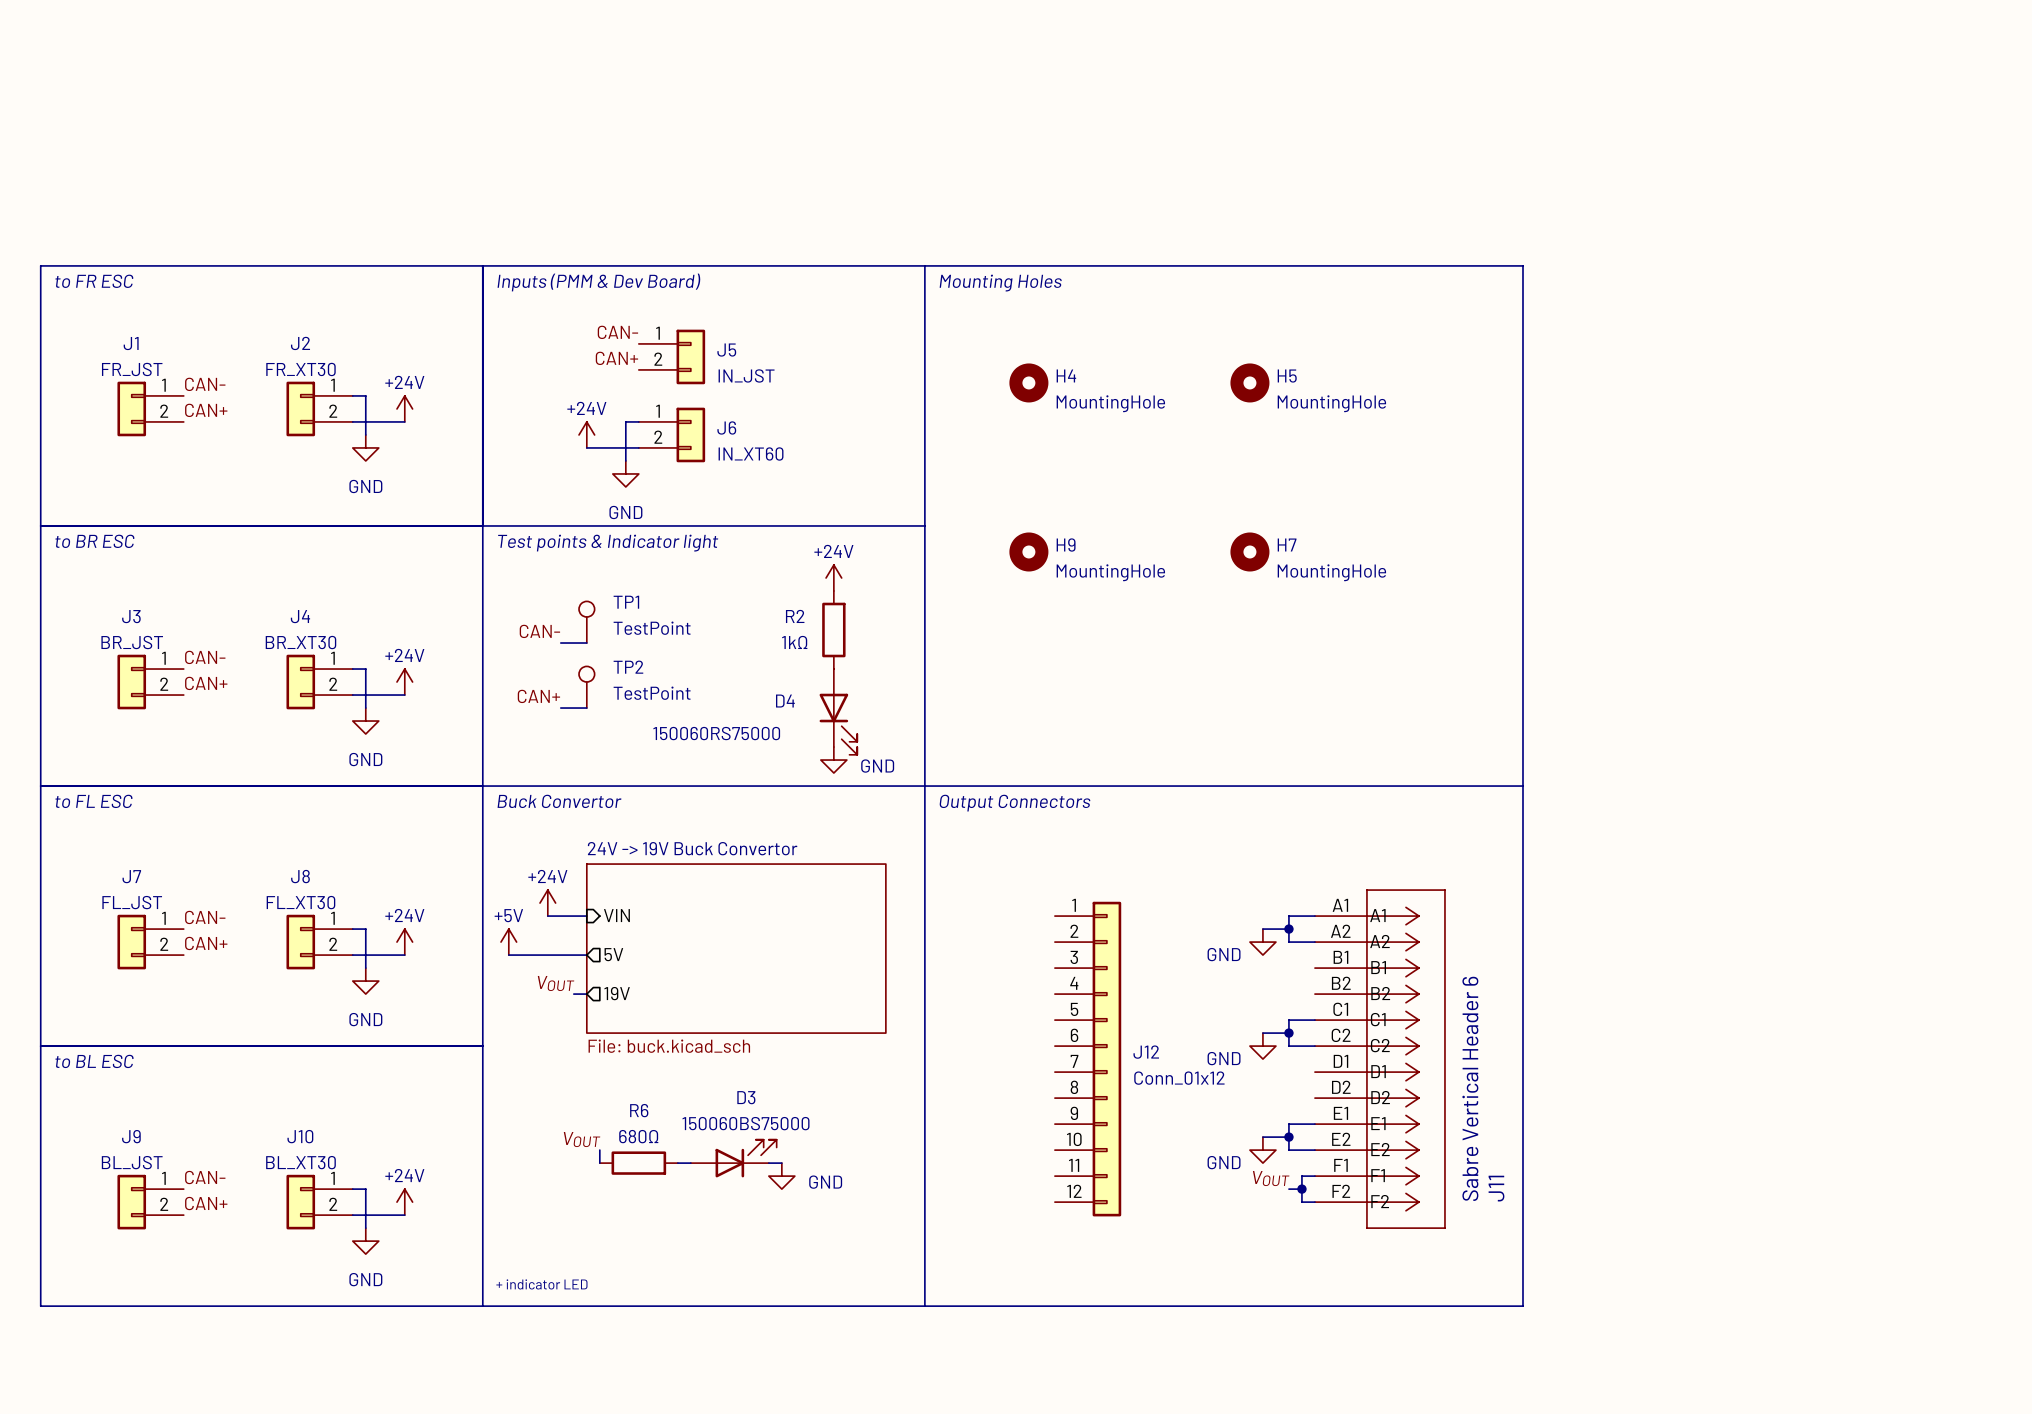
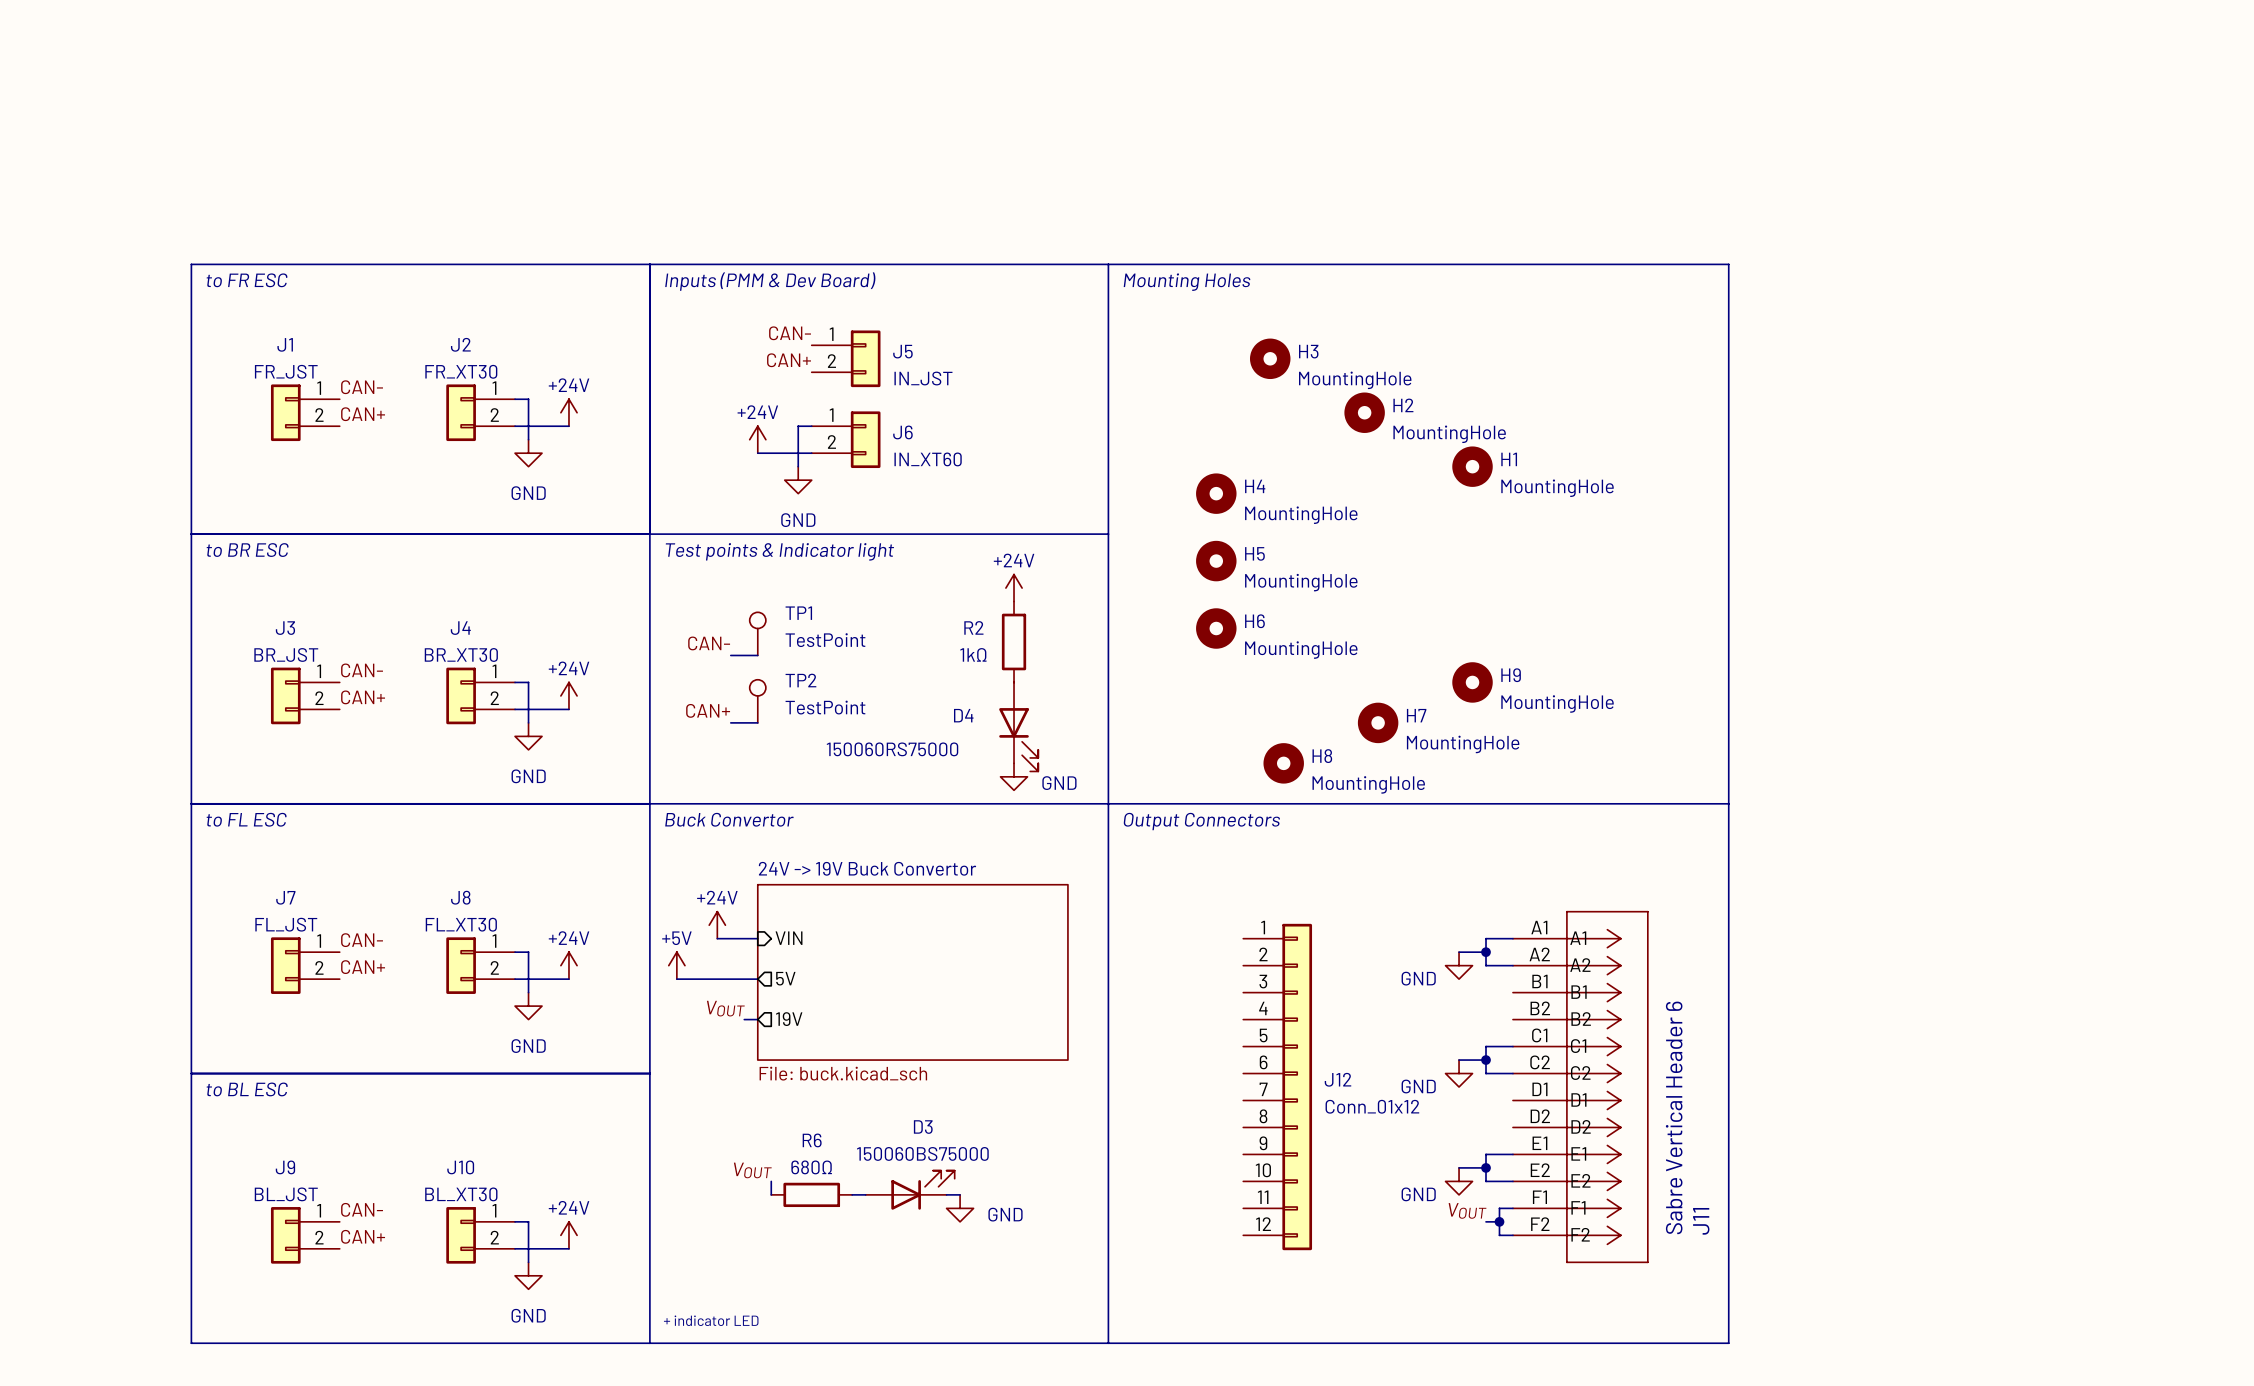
H3: none -> MountingHole (1270, 358)
H4 position: (1028, 382) -> (1216, 493)
H5: MountingHole (1249, 382) -> none
H2: none -> MountingHole (1364, 412)
H1: none -> MountingHole (1472, 466)
H9 name: H9 (1066, 545) -> H5 (1254, 553)
H7 position: (1249, 551) -> (1378, 722)
H6: none -> MountingHole (1216, 628)
H9: none -> MountingHole (1472, 682)
H8: none -> MountingHole (1283, 763)

